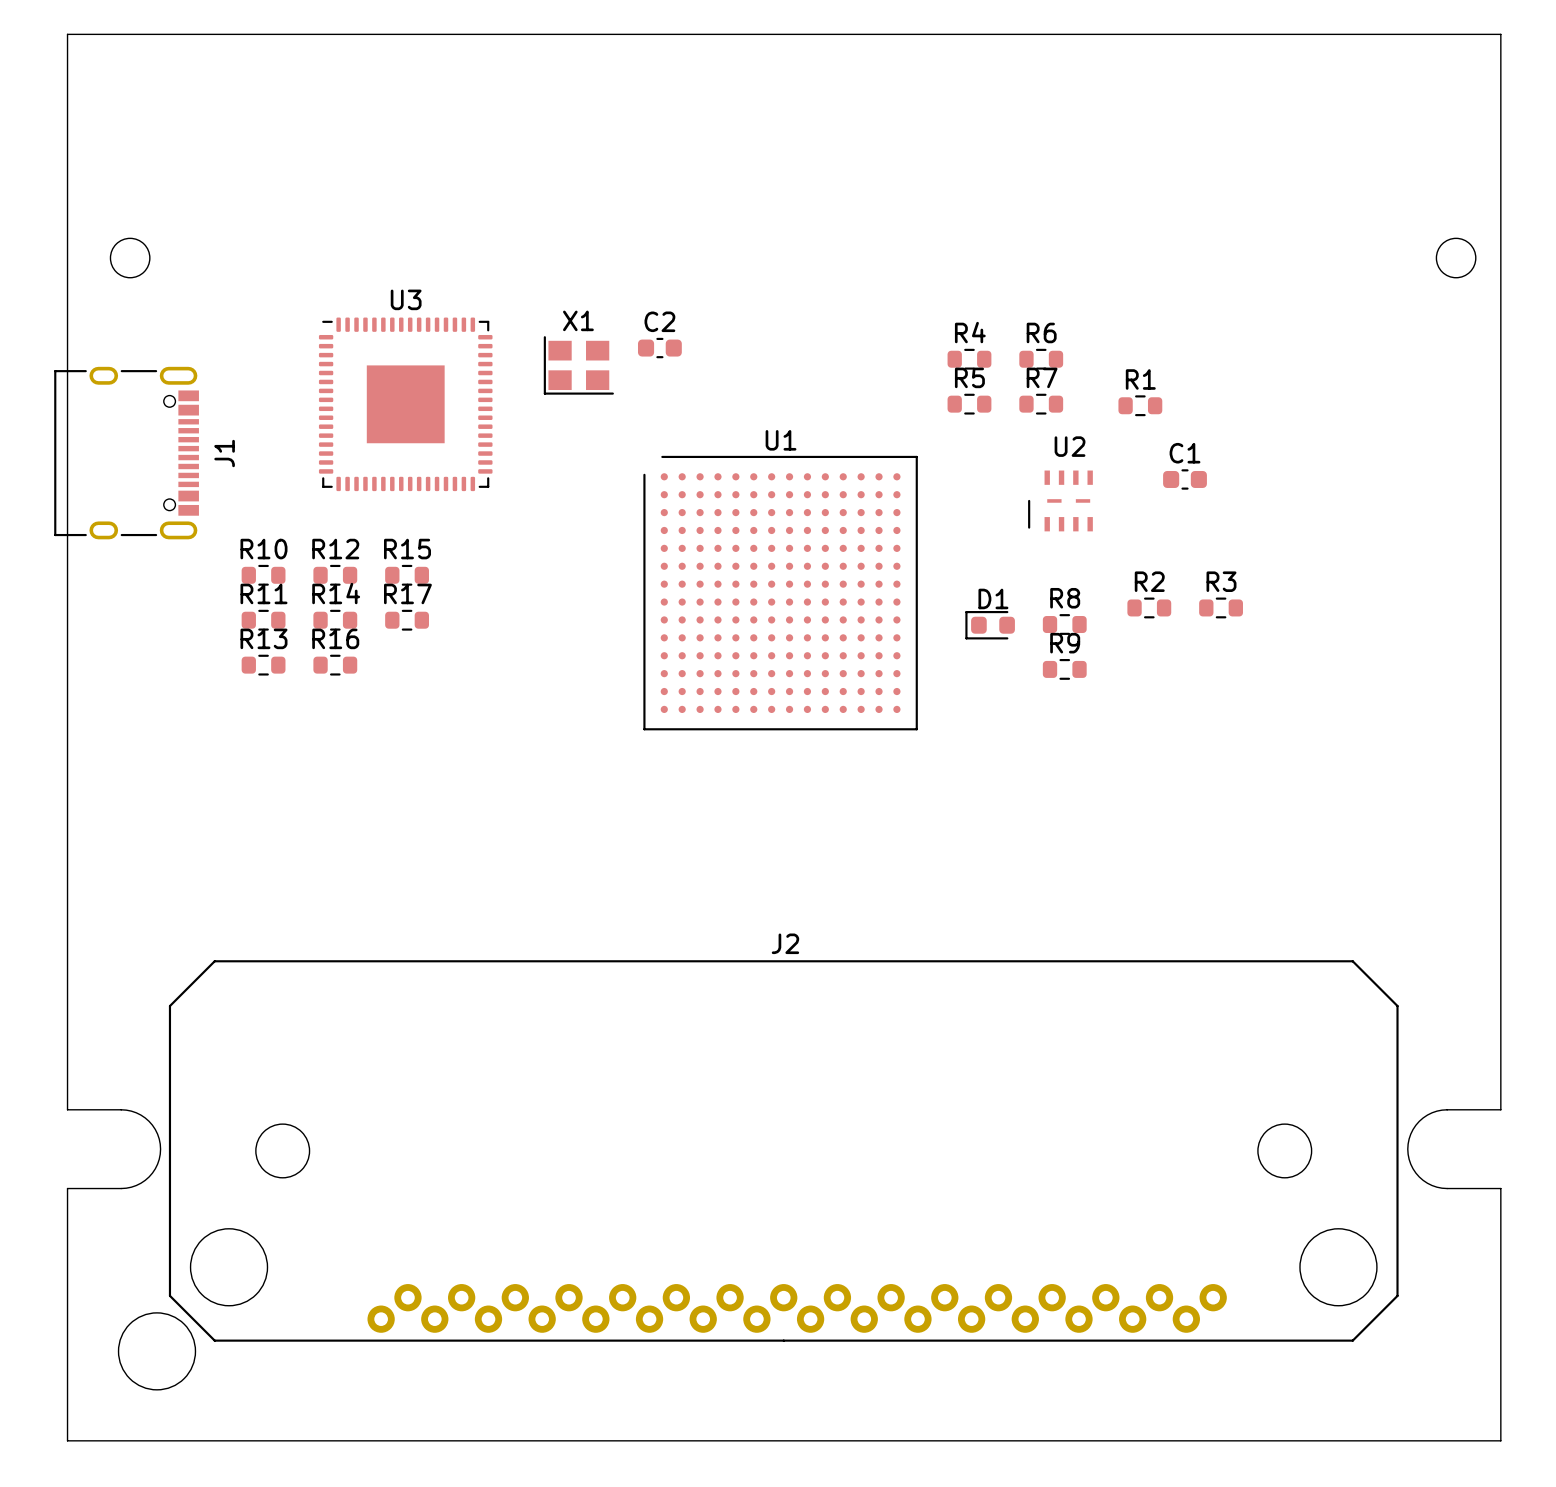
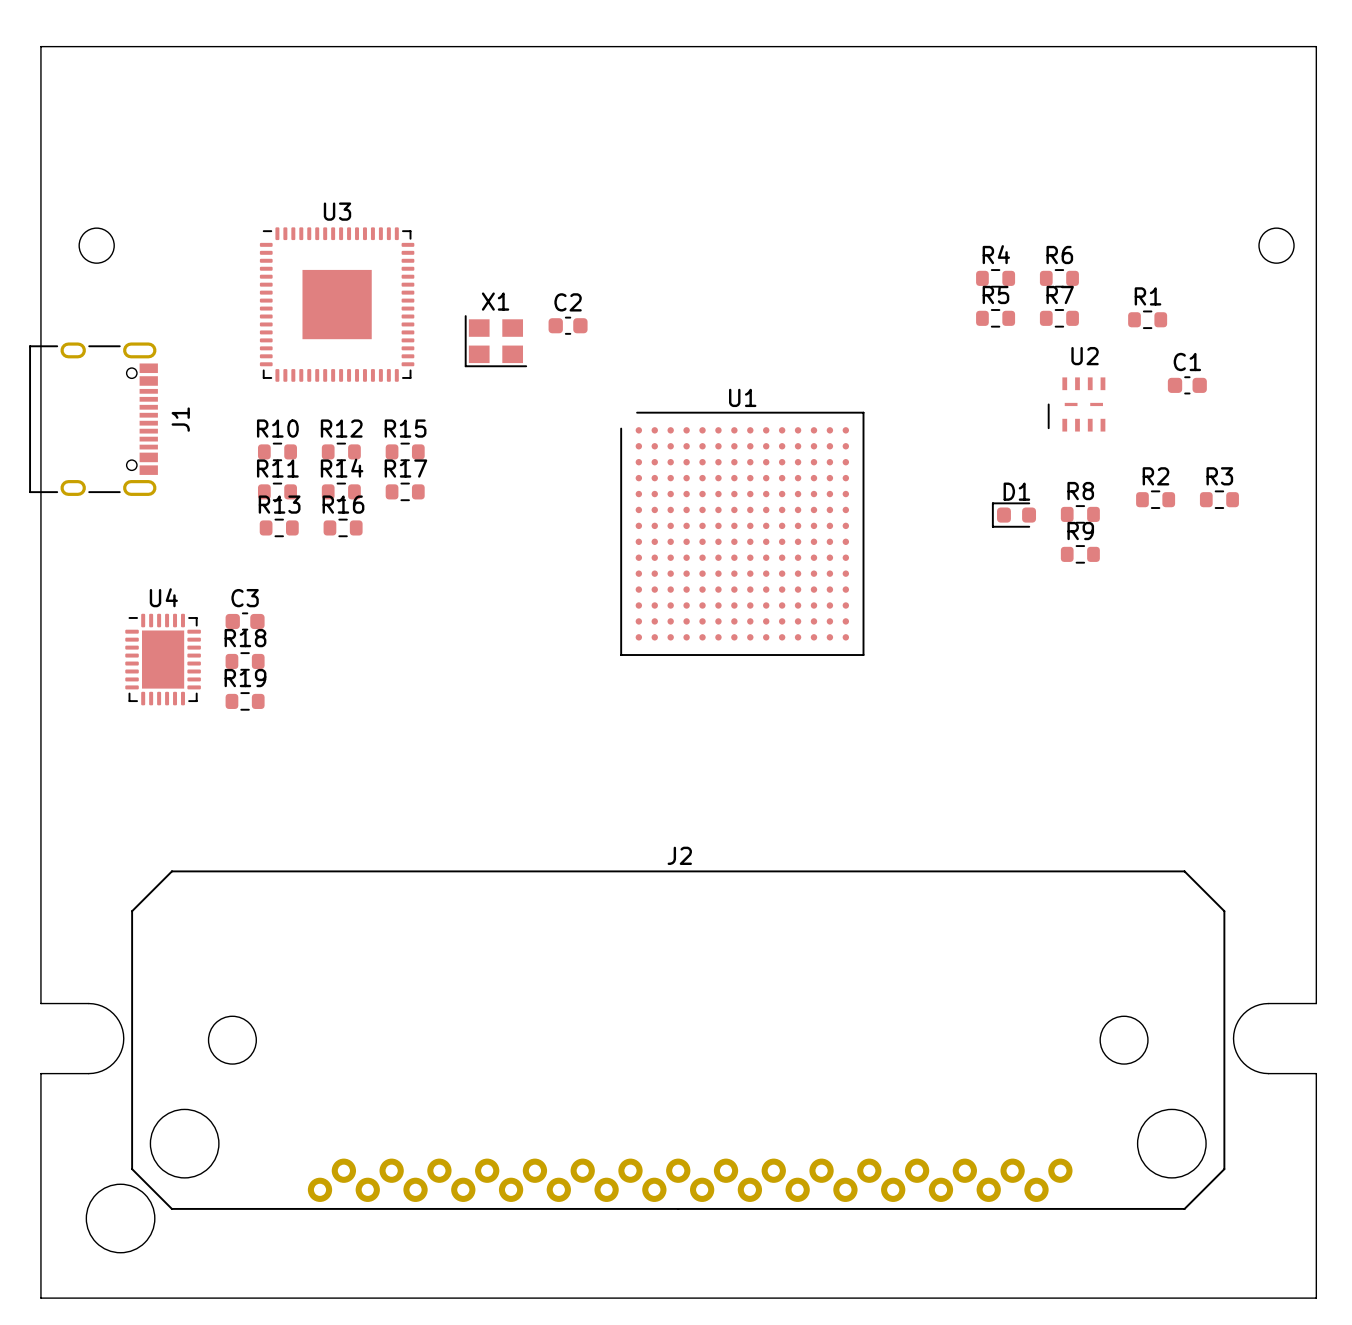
R4 position: (969, 359) -> (995, 278)
R6 position: (1041, 359) -> (1059, 278)
U3 position: (405, 404) -> (337, 304)
R5 position: (969, 404) -> (995, 318)
R7 position: (1041, 404) -> (1059, 318)
R1 position: (1140, 405) -> (1147, 319)
C1 position: (1185, 479) -> (1187, 385)
R12: none -> (341, 451)
R15: none -> (405, 451)
U2 position: (1060, 500) -> (1076, 404)
R12 name: R12 (335, 549) -> R13 (279, 504)
R15 name: R15 (407, 549) -> R16 (343, 504)
R10 position: (263, 575) -> (277, 451)
U1 position: (780, 593) -> (742, 533)
R2 position: (1149, 607) -> (1155, 499)
R3 position: (1221, 607) -> (1219, 499)
R11 position: (263, 620) -> (277, 491)
R14 position: (335, 620) -> (341, 491)
R17 position: (407, 620) -> (405, 491)
R8 position: (1064, 624) -> (1080, 514)
D1 position: (990, 625) -> (1013, 515)
R13: (263, 665) -> none
R16: (335, 665) -> none
R9 position: (1064, 669) -> (1080, 554)
C3: none -> (245, 621)
U4: none -> (163, 659)
R18: none -> (245, 661)
R19: none -> (245, 701)

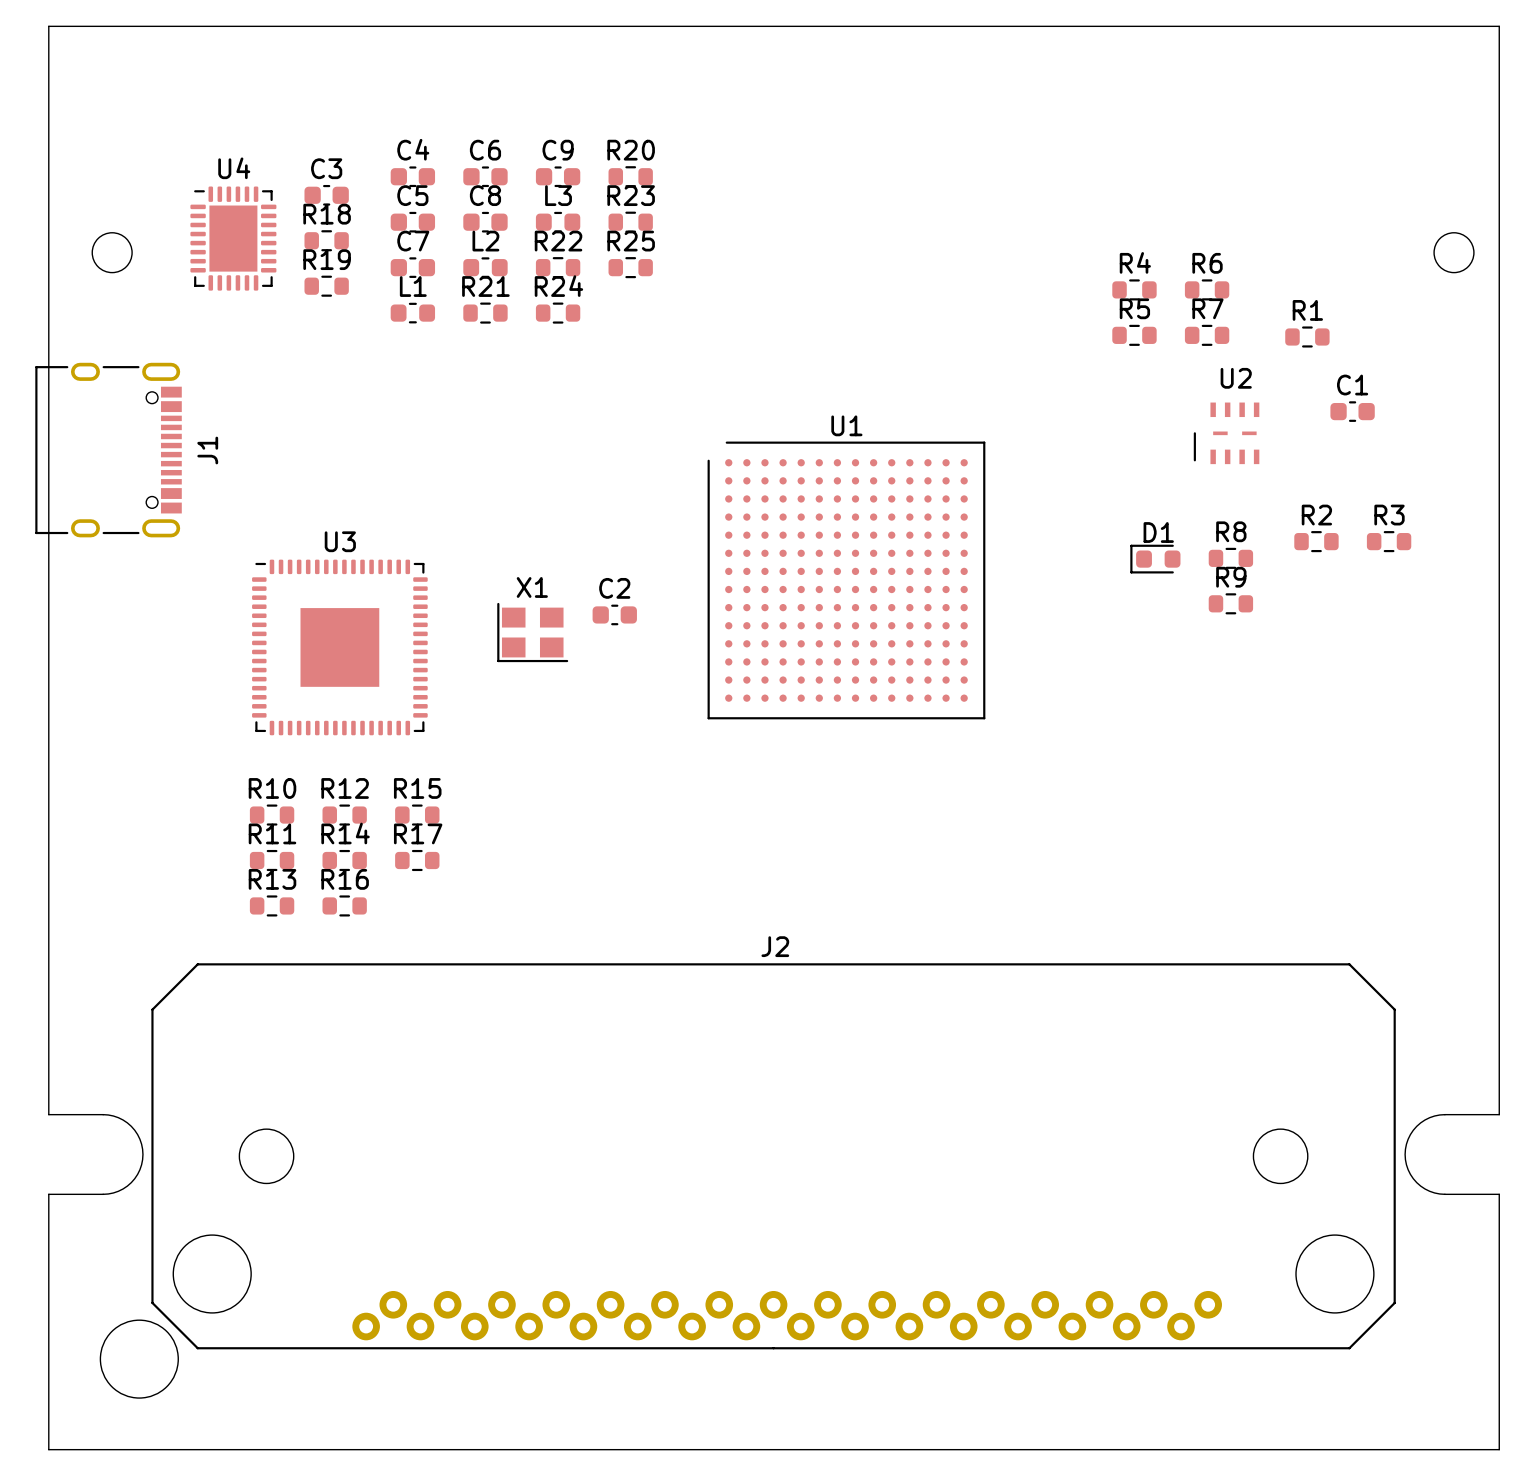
C4: none -> (412, 176)
C6: none -> (485, 176)
C9: none -> (558, 176)
R20: none -> (630, 176)
C5: none -> (412, 222)
C8: none -> (485, 222)
L3: none -> (558, 222)
R23: none -> (630, 222)
C7: none -> (412, 267)
L2: none -> (485, 267)
R22: none -> (558, 267)
R25: none -> (630, 267)
L1: none -> (412, 313)
R21: none -> (485, 313)
R24: none -> (558, 313)
U3 position: (337, 304) -> (339, 647)
C2 position: (568, 325) -> (614, 614)
X1 position: (495, 341) -> (532, 632)
R10 position: (277, 451) -> (272, 815)
R12 position: (341, 451) -> (344, 815)
R15 position: (405, 451) -> (417, 815)
R11 position: (277, 491) -> (272, 860)
R14 position: (341, 491) -> (344, 860)
R17 position: (405, 491) -> (417, 860)
R13 position: (279, 527) -> (272, 905)
R16 position: (343, 527) -> (344, 905)
C3 position: (245, 621) -> (326, 195)
U4 position: (163, 659) -> (233, 238)
R18 position: (245, 661) -> (326, 240)
R19 position: (245, 701) -> (326, 286)

